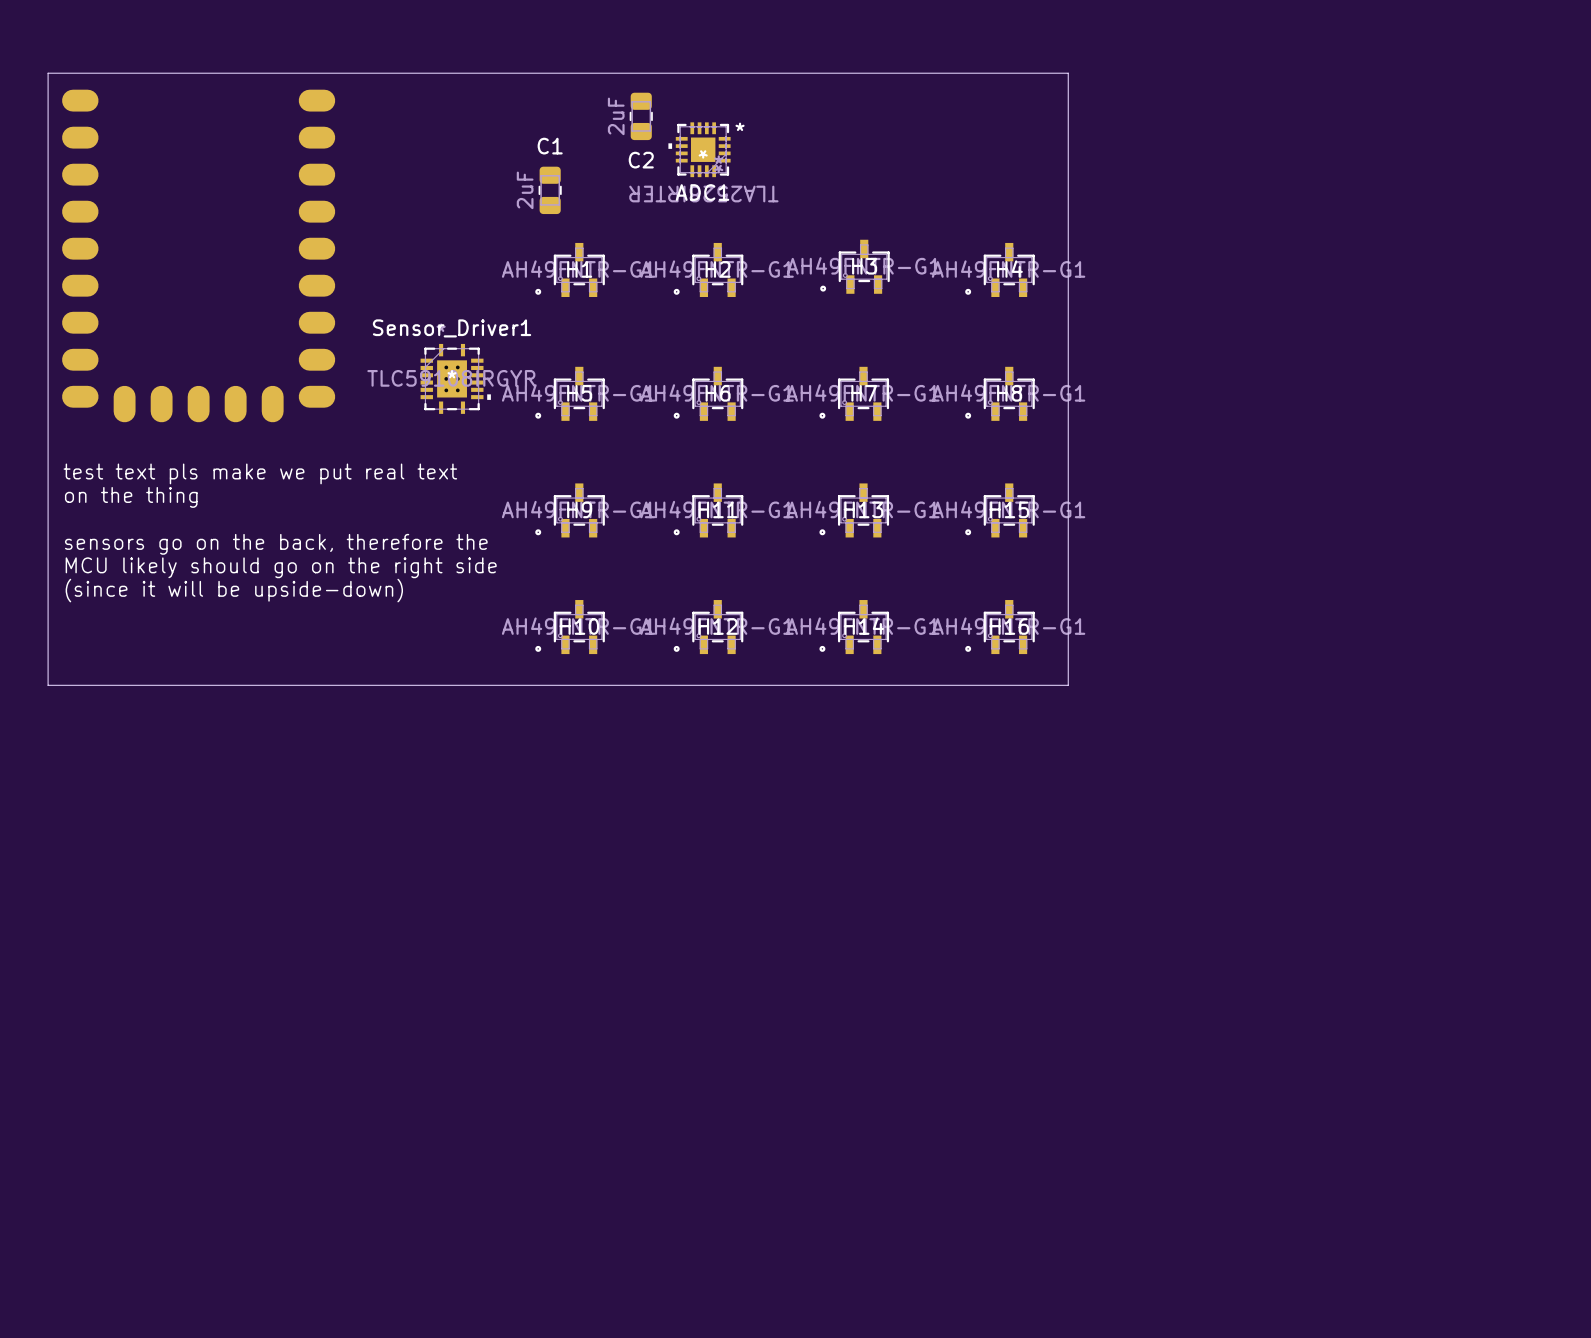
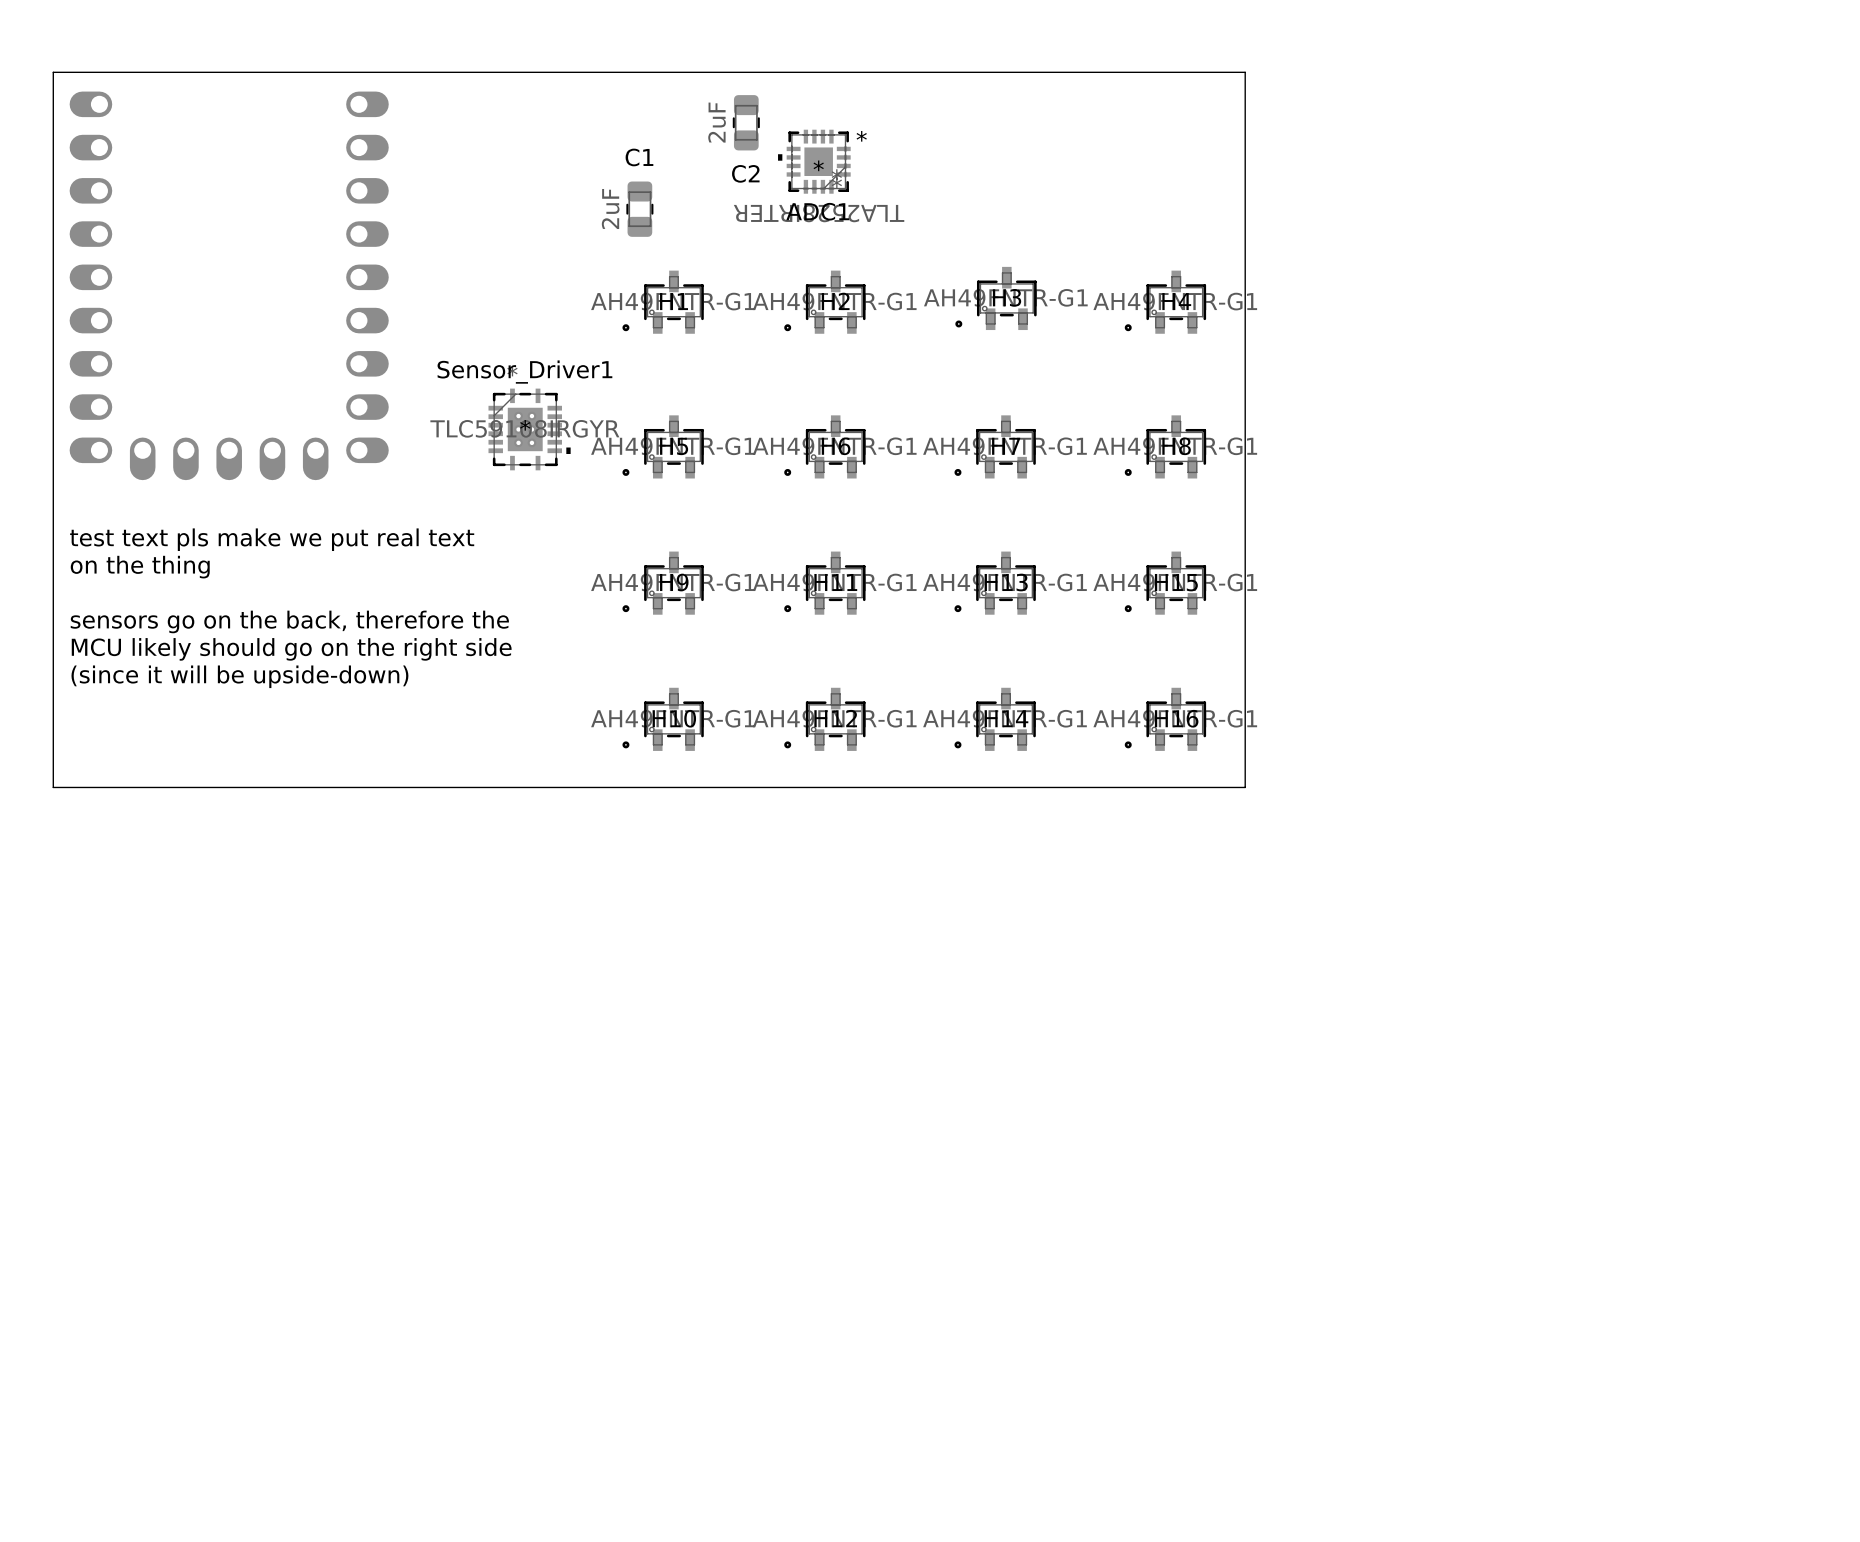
part footprint: [62, 89, 336, 423] -> [69, 91, 389, 481]

